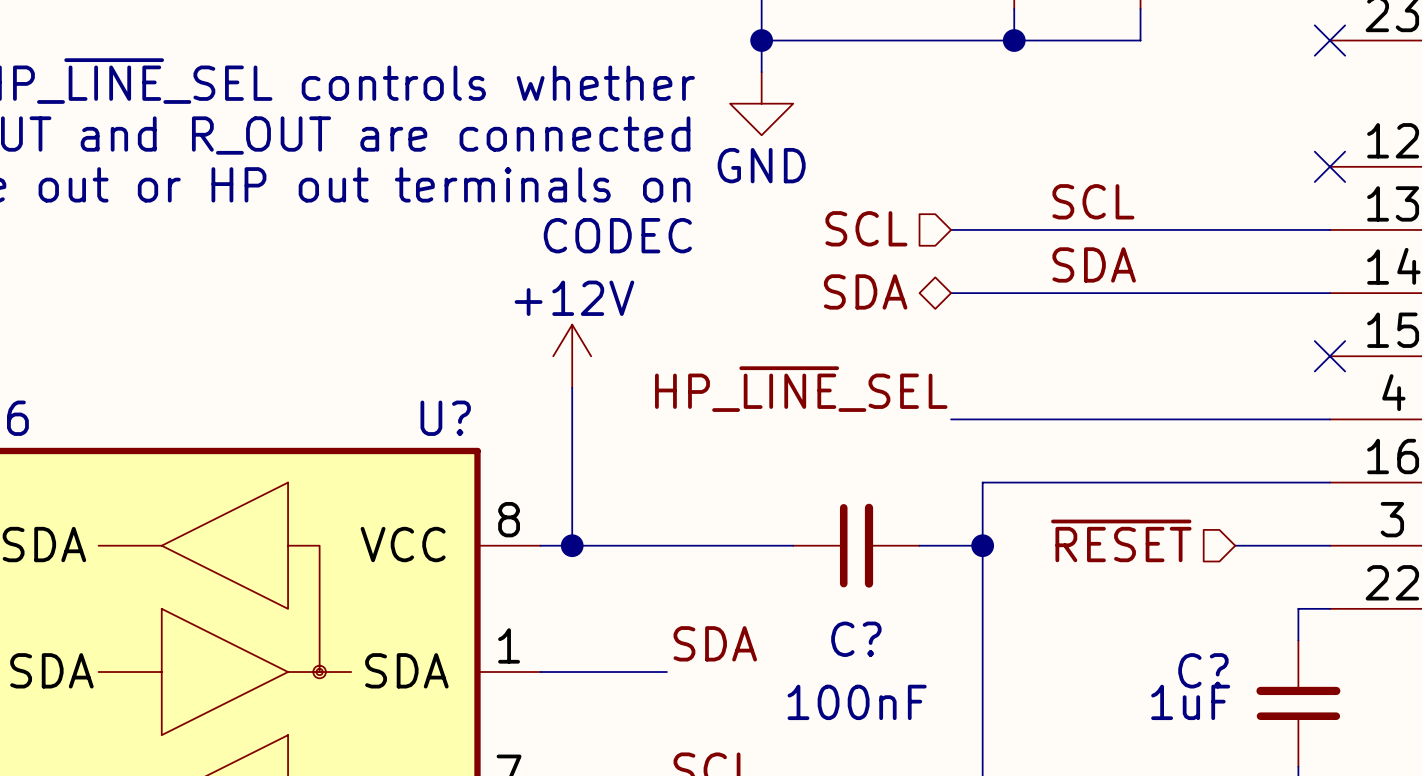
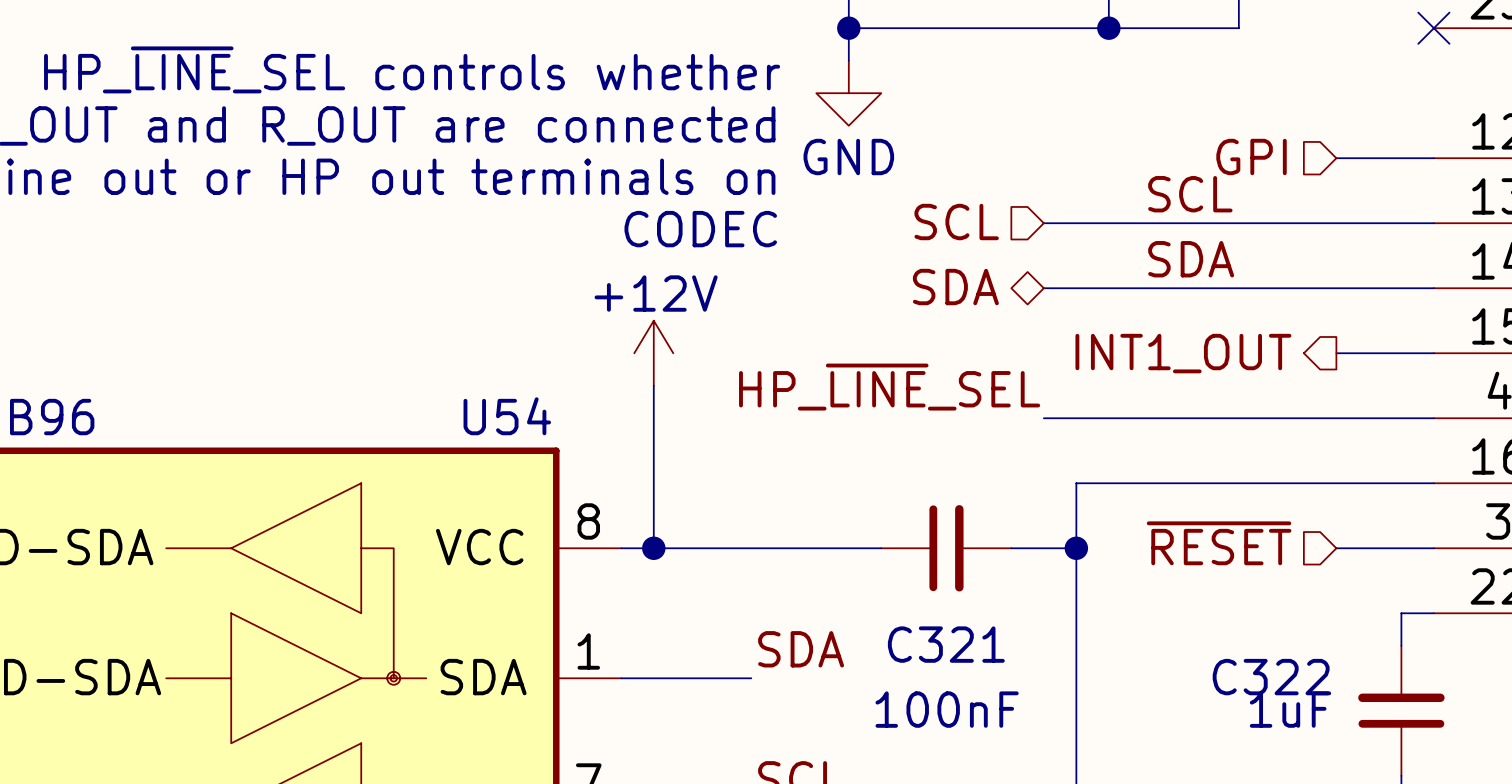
hierarchical label: none -> GPI (1251, 157)
wire: none -> (1336, 158) (1433, 158)
no-connect mark: (1329, 166) -> none
hierarchical label: none -> INT1_OUT (1183, 353)
wire: none -> (1336, 353) (1433, 353)
no-connect mark: (1329, 356) -> none
U? name: U? (445, 418) -> U54 (507, 416)
C? name: C? (856, 639) -> C321 (946, 644)
C? name: C? (1203, 670) -> C322 (1271, 677)

